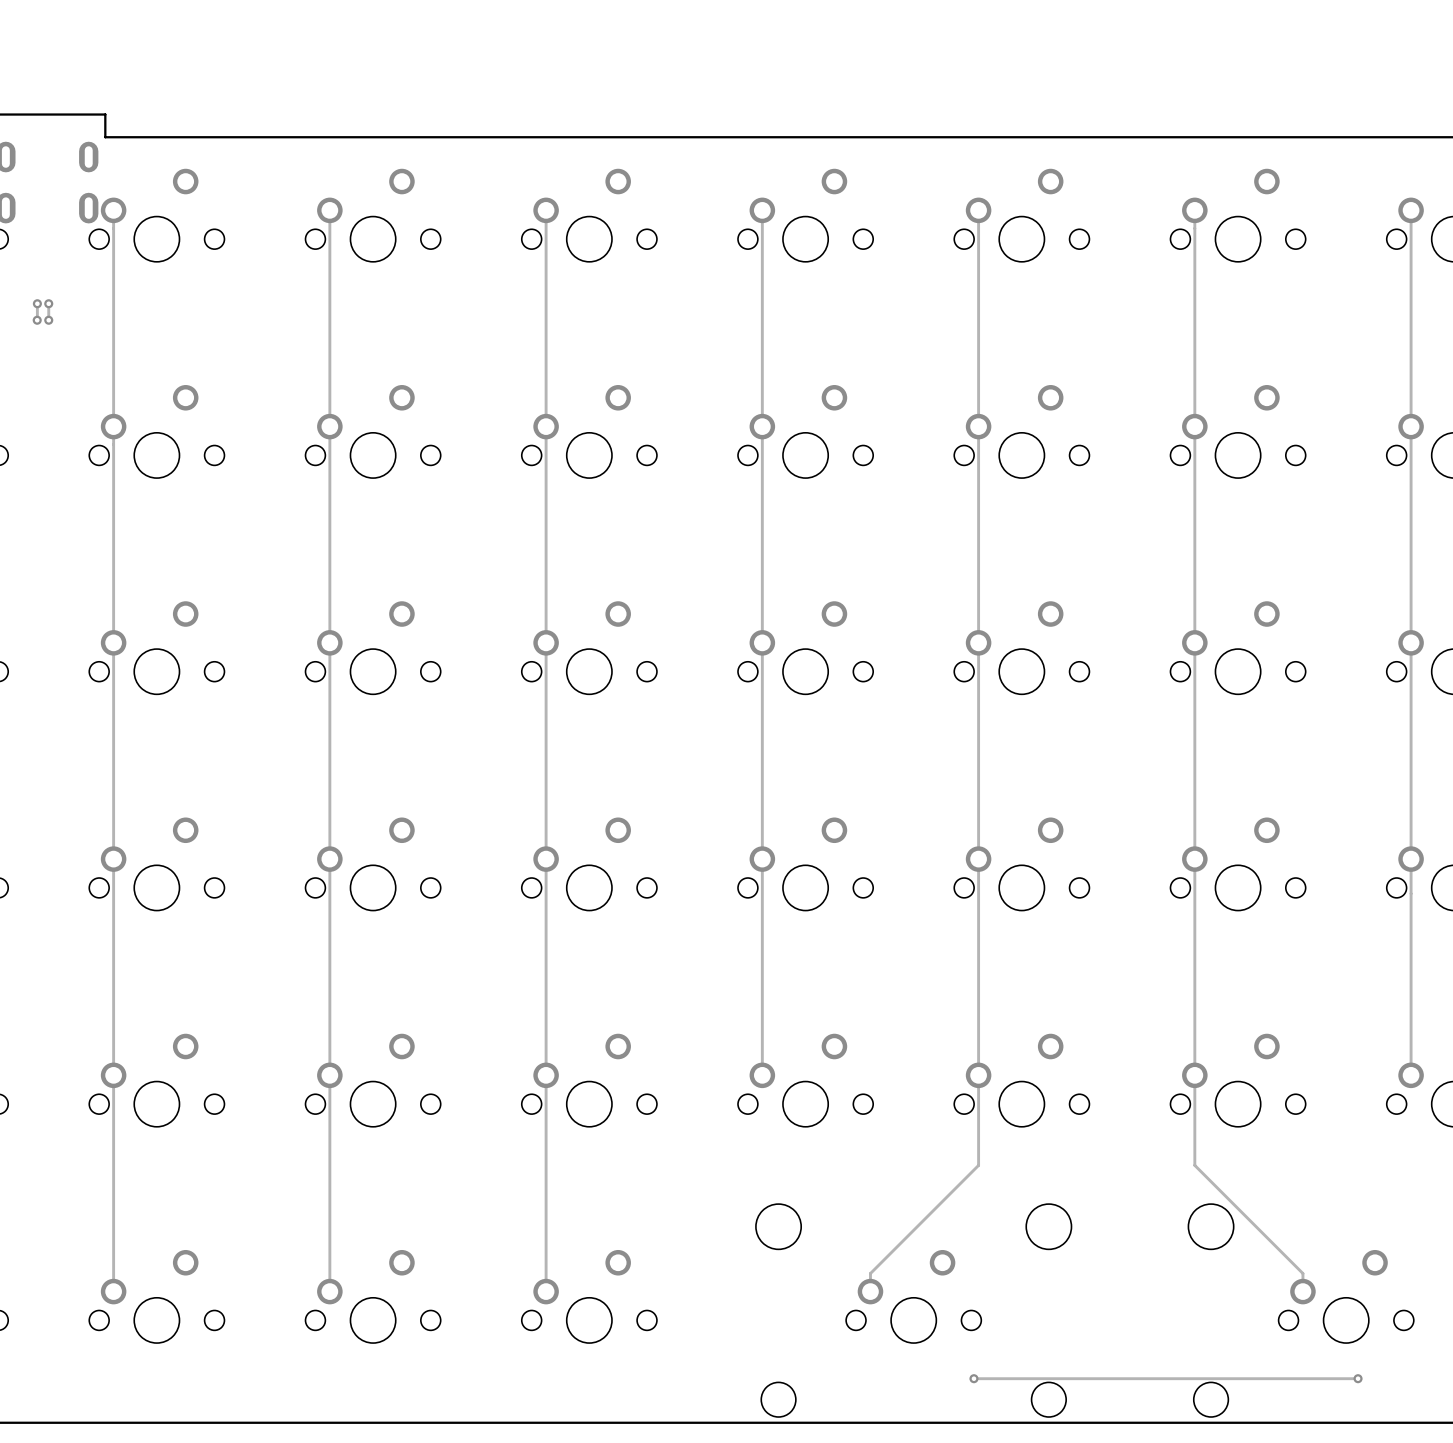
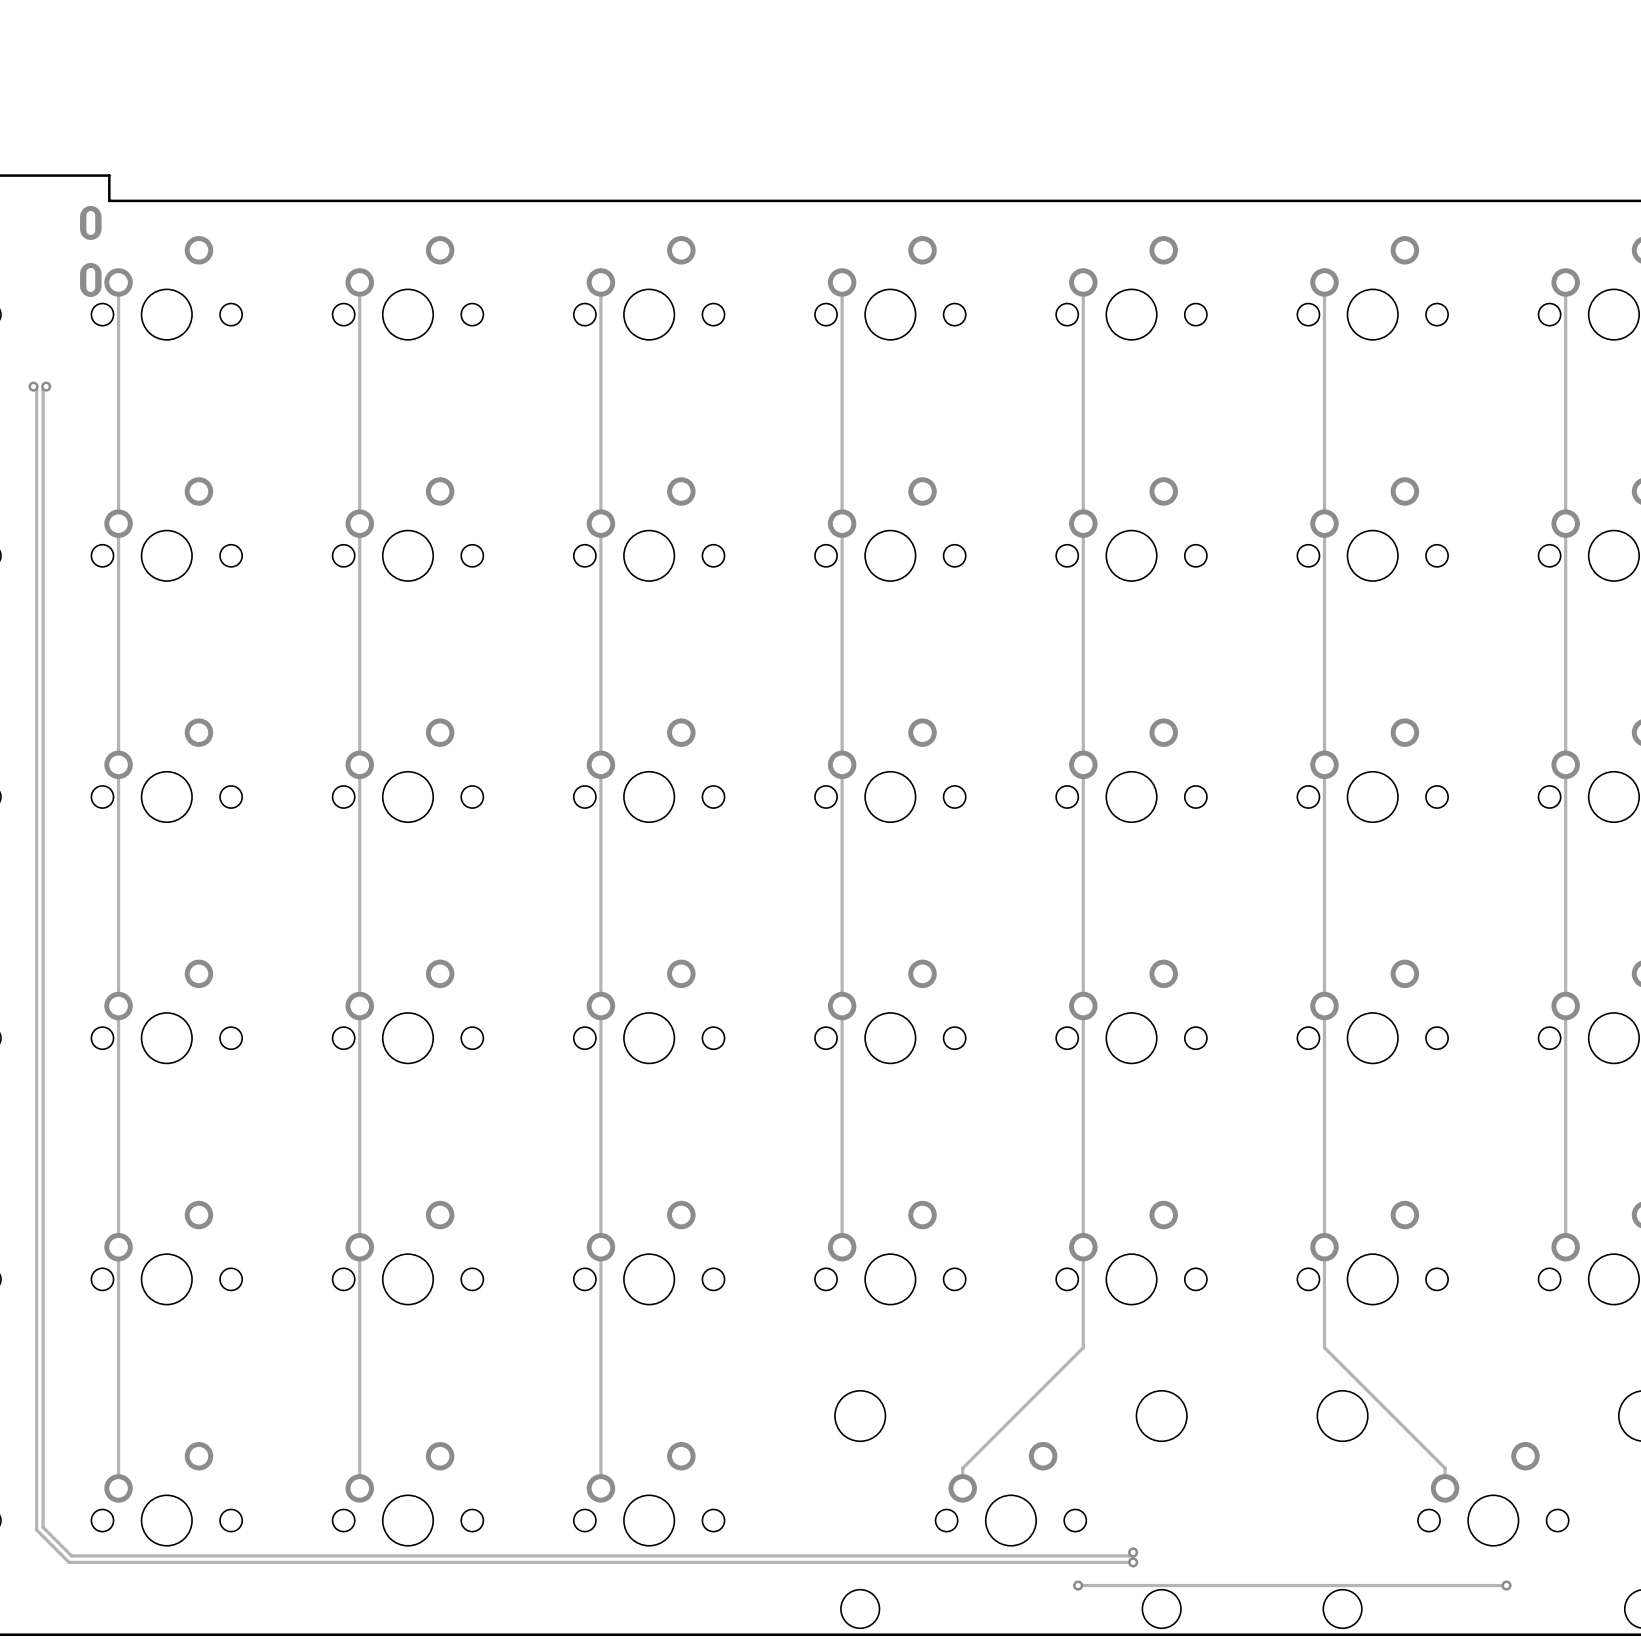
track: (37, 303) (37, 320) -> (33, 386) (36, 389) (36, 1530) (68, 1562) (1129, 1562) (1133, 1565)
track: (48, 303) (48, 320) -> (46, 386) (43, 389) (43, 1527) (71, 1555) (1129, 1555) (1133, 1552)
via: (37, 320) -> none
via: (48, 320) -> none
via: none -> (1133, 1552)
via: none -> (1133, 1562)

